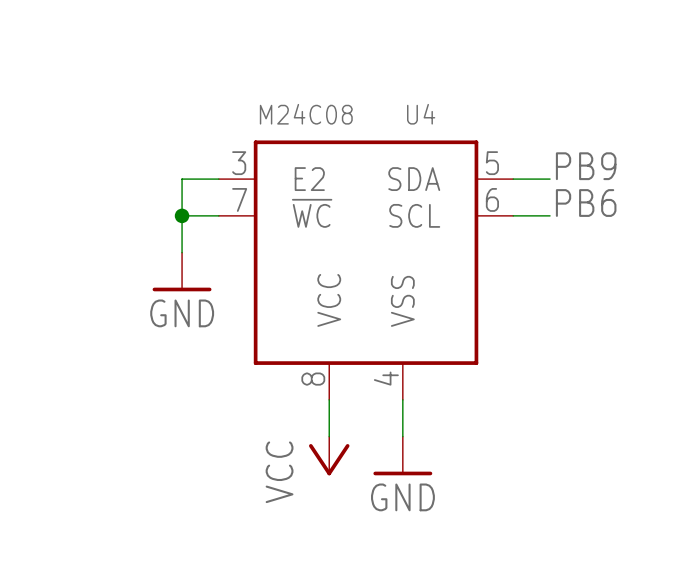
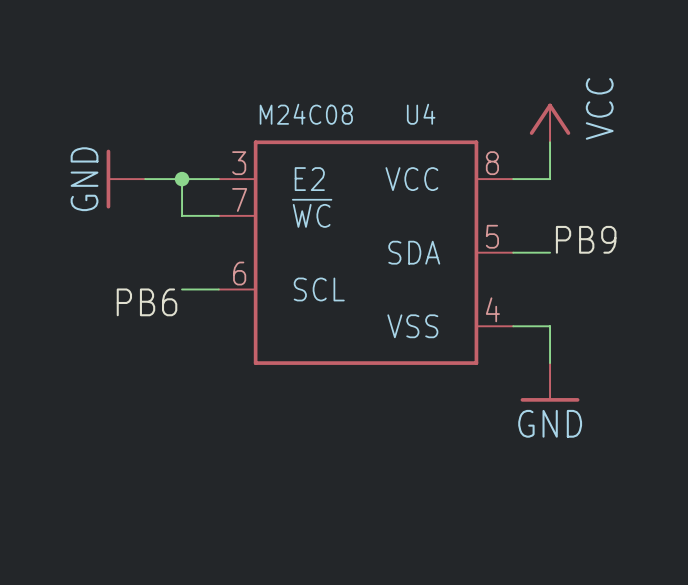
power symbol: none -> VCC (550, 122)
U4 symbol: [218, 140, 514, 400] -> [218, 140, 514, 365]
label position: PB9 (586, 166) -> PB9 (586, 239)
wire: none -> (145, 179) (182, 179)
label: PB6 (586, 203) -> none
wire: (182, 215) (182, 252) -> none
junction position: (182, 215) -> (182, 179)
wire: (513, 215) (550, 215) -> (513, 252) (550, 252)
power symbol position: GND (182, 272) -> GND (125, 179)
power symbol rotation: 0° (182, 289) -> 90° clockwise (108, 179)
label: none -> PB6 (147, 302)
wire: none -> (513, 326) (550, 326) (550, 363)
wire: (329, 399) (329, 436) -> none
wire: (402, 399) (402, 436) -> (550, 142) (550, 179)
power symbol: VCC (329, 456) -> none
power symbol position: GND (402, 456) -> GND (550, 382)

